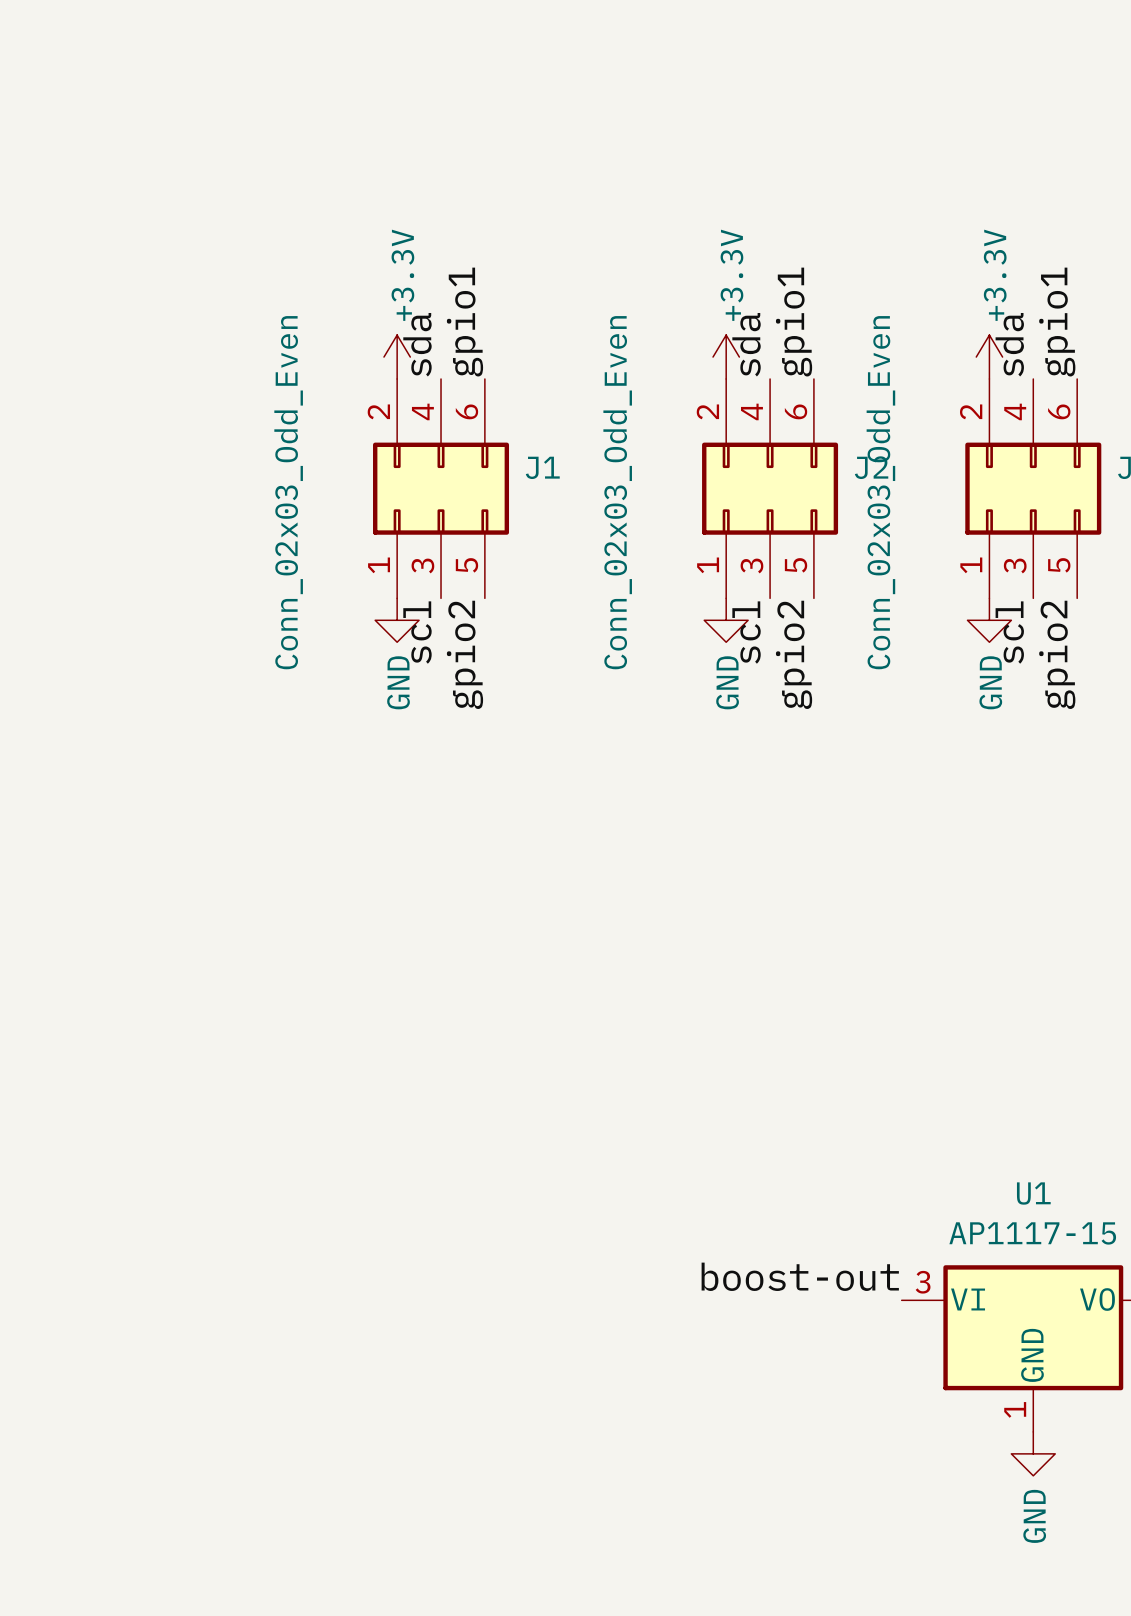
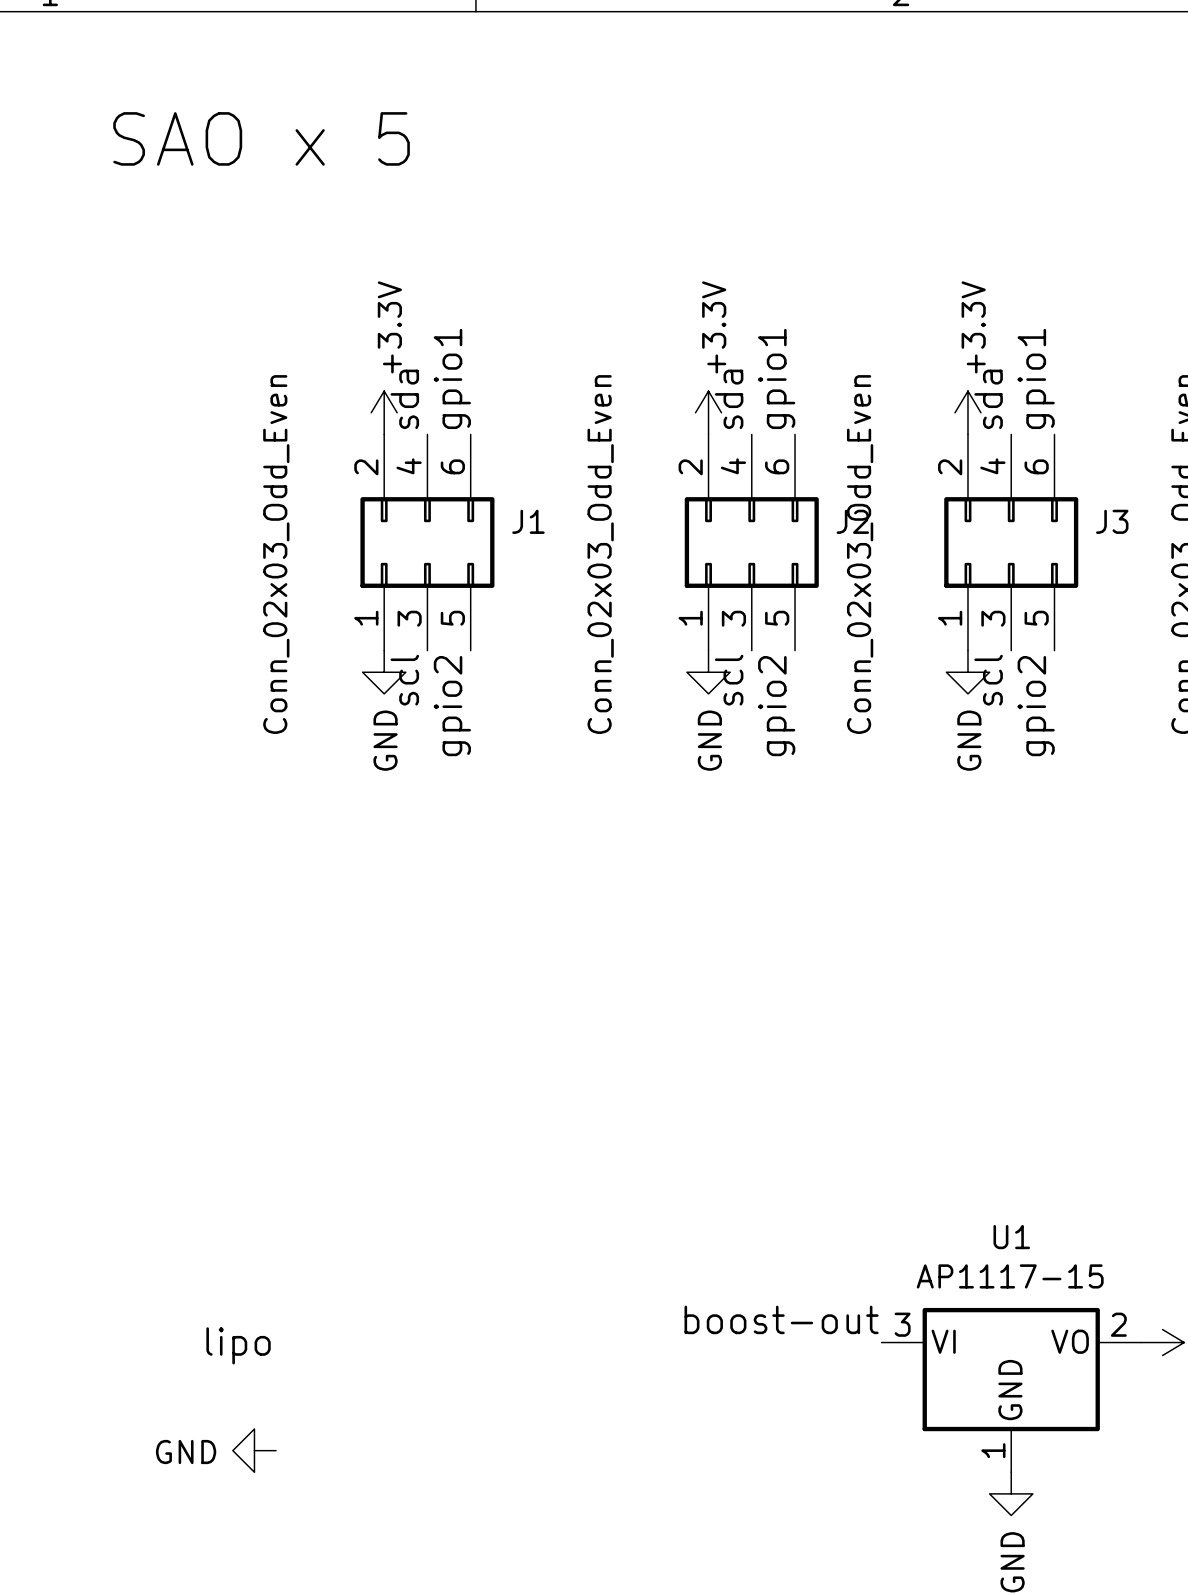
text: none -> SAO x 5 (261, 138)
label: none -> lipo (238, 1345)
power symbol: none -> GND (254, 1450)

